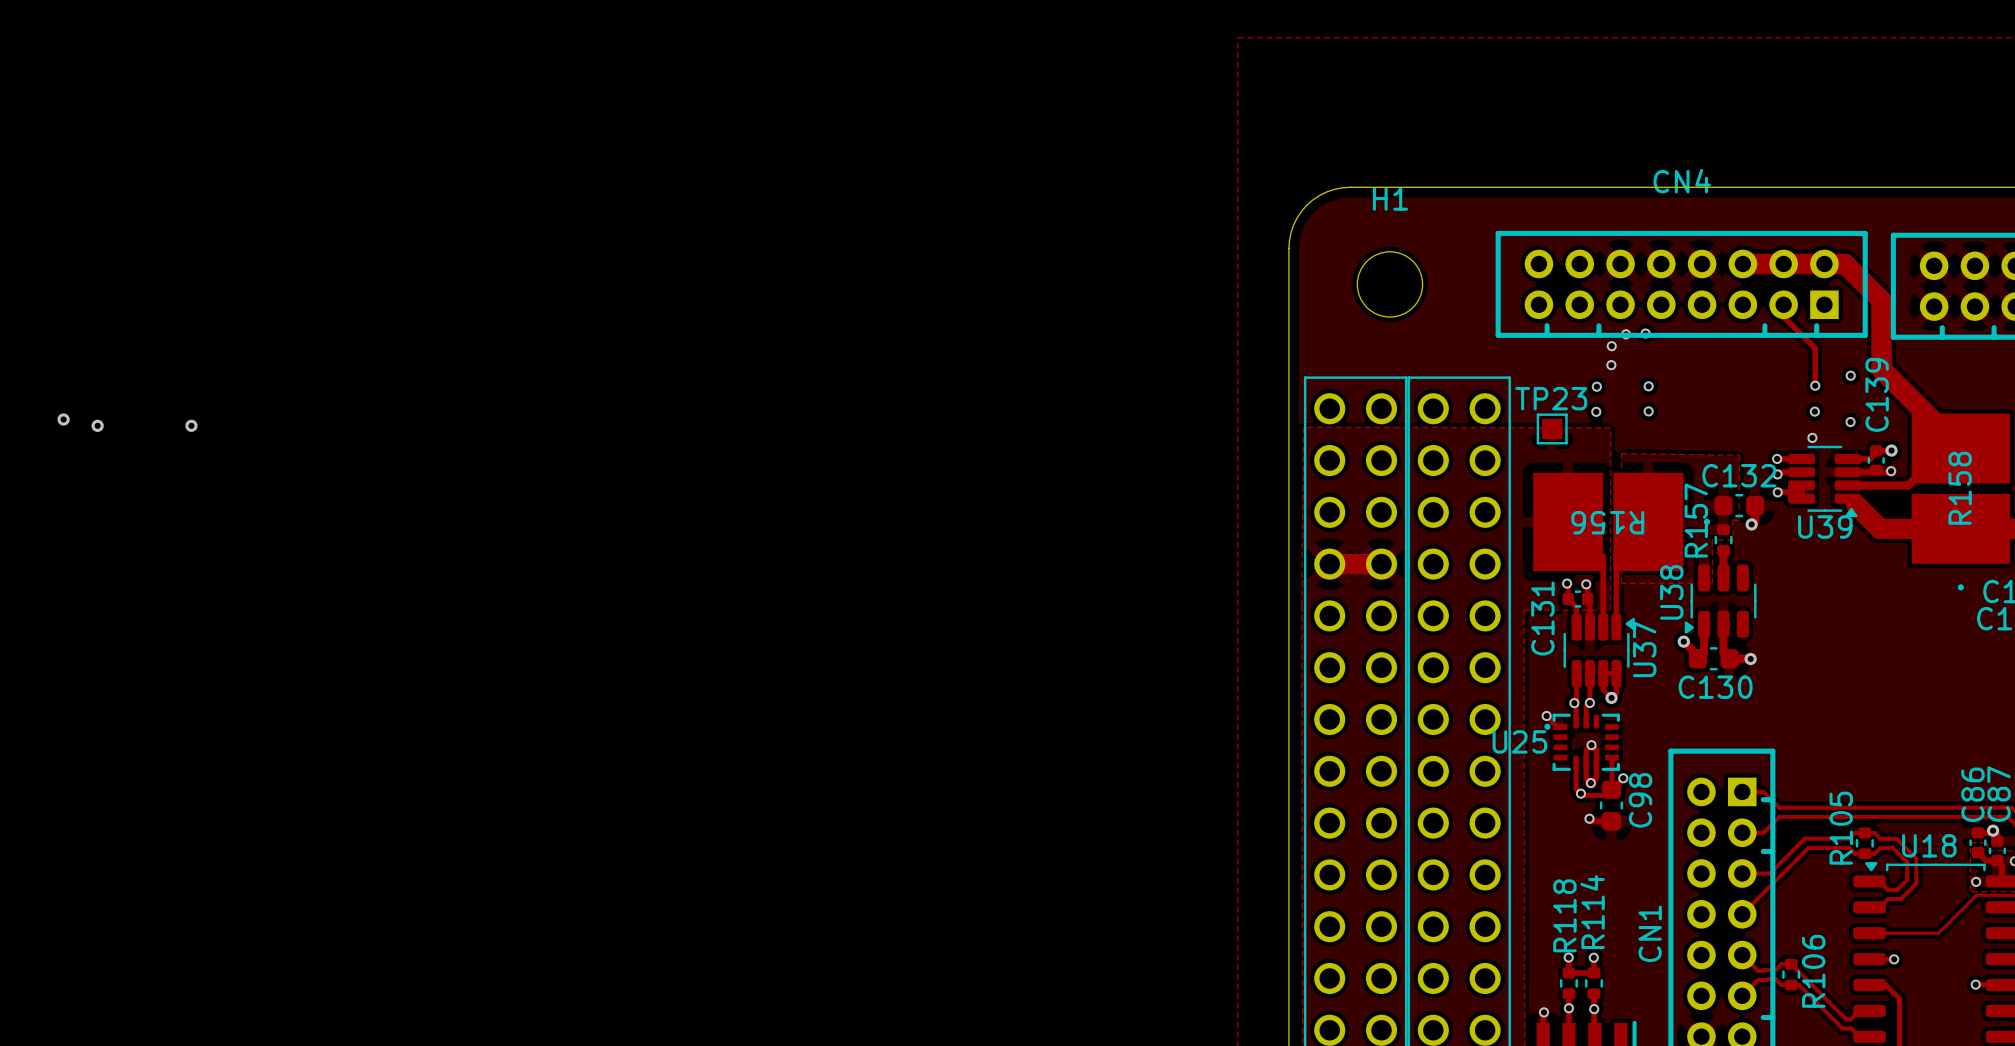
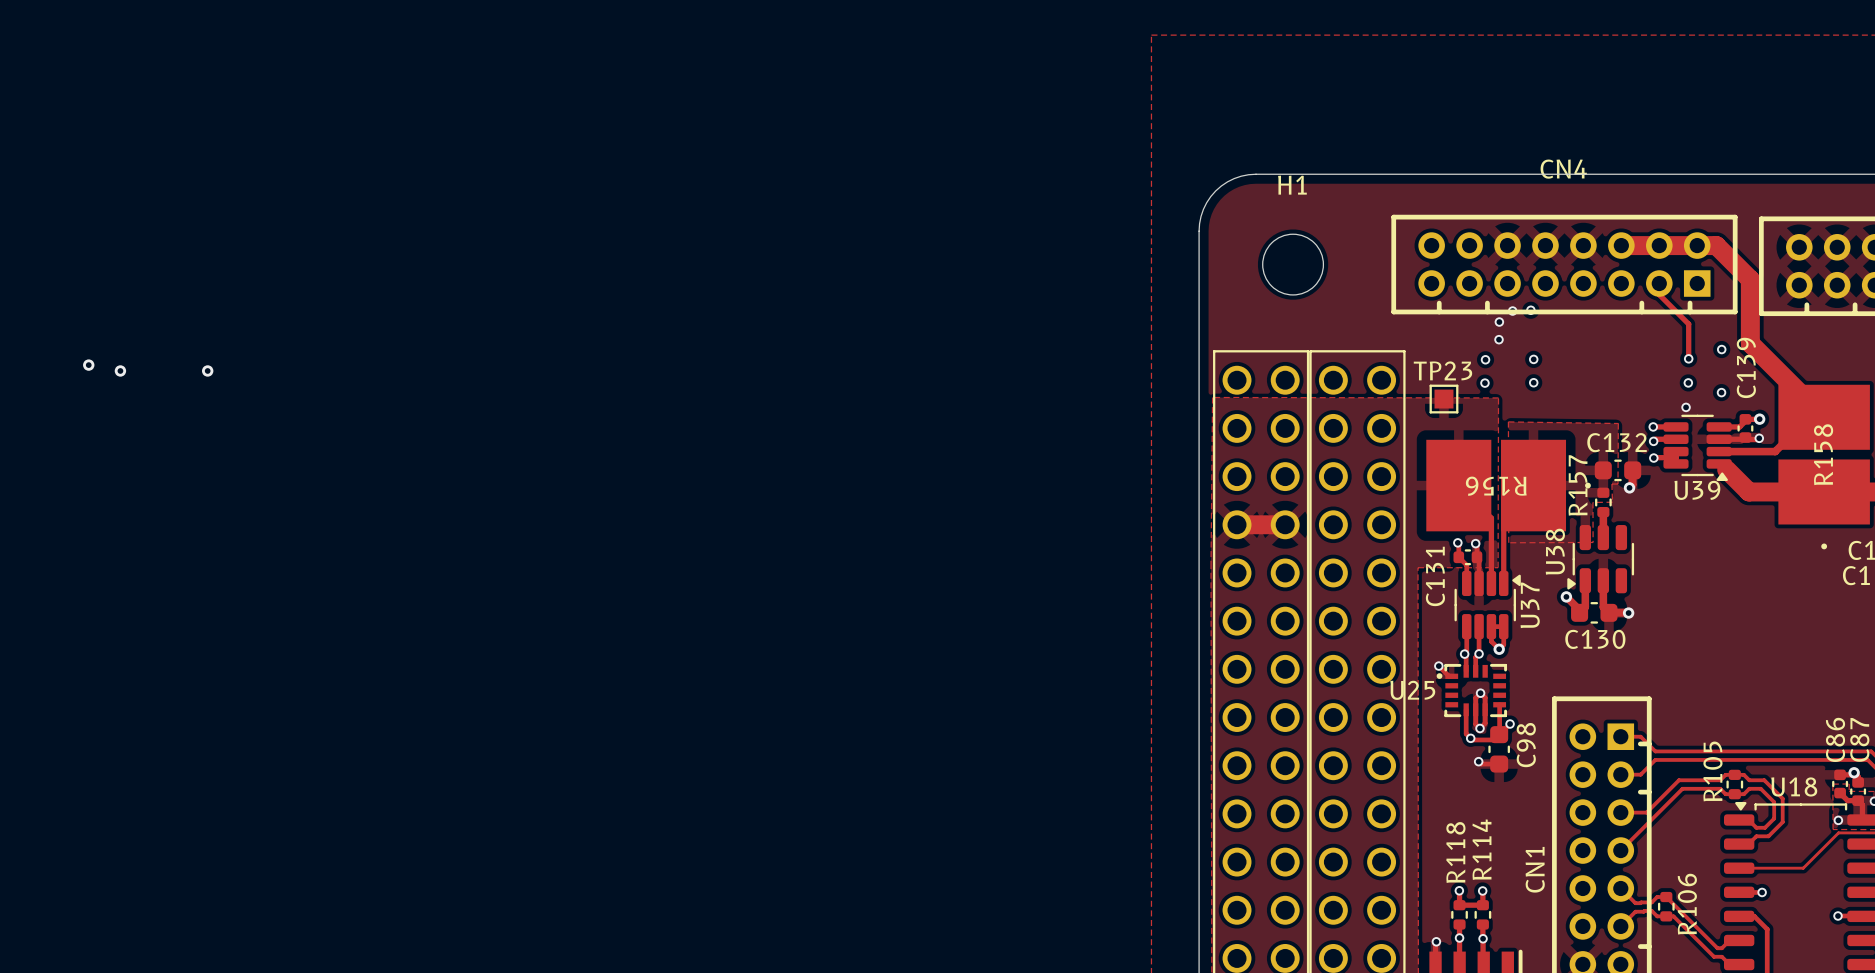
via: none -> (88, 365)
via: none -> (120, 370)
via: none -> (207, 370)
via: (63, 419) -> none
via: (97, 425) -> none
via: (191, 425) -> none

